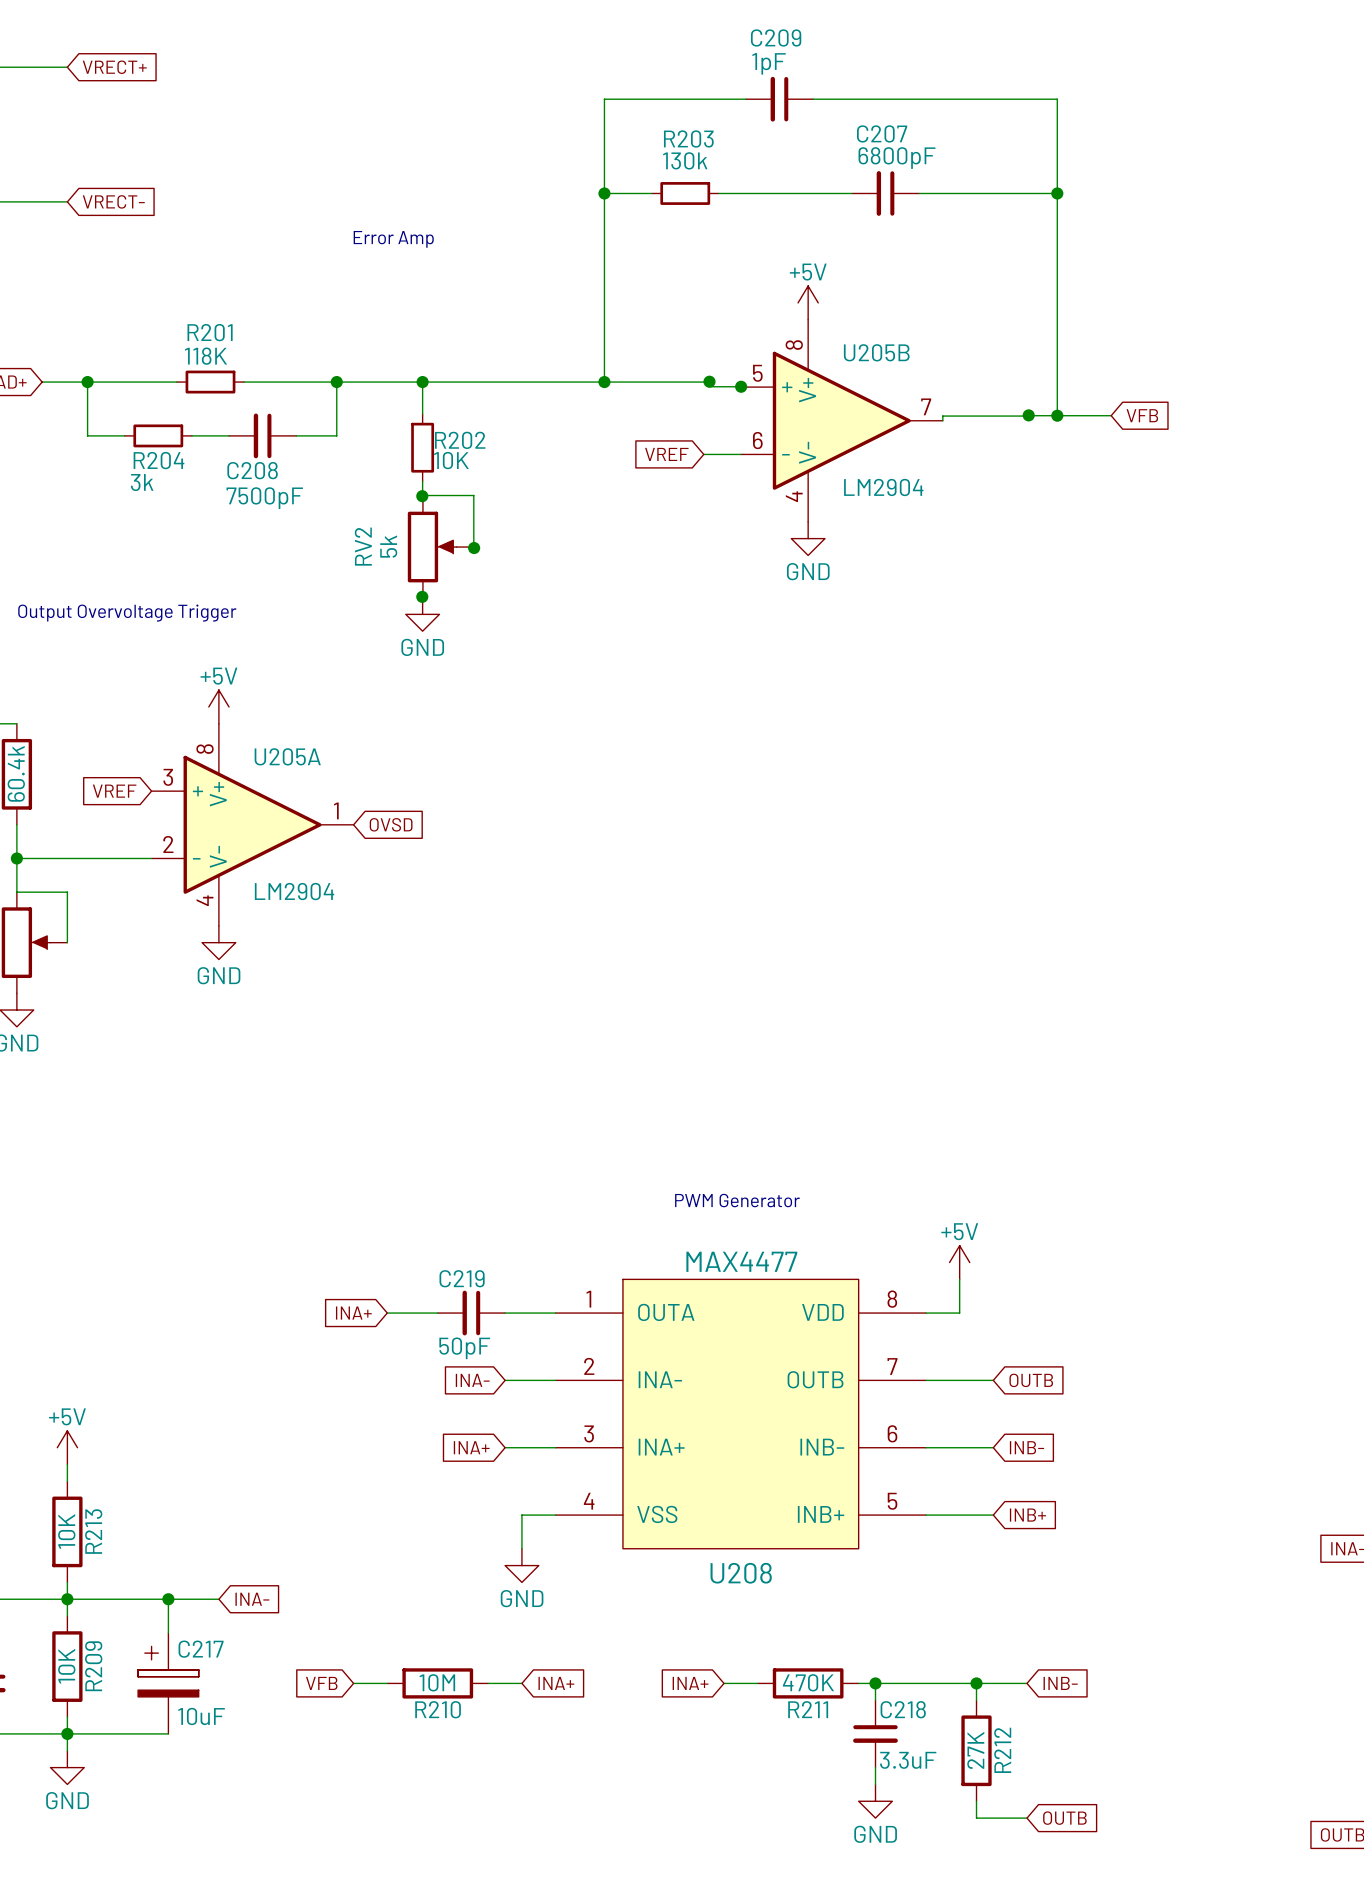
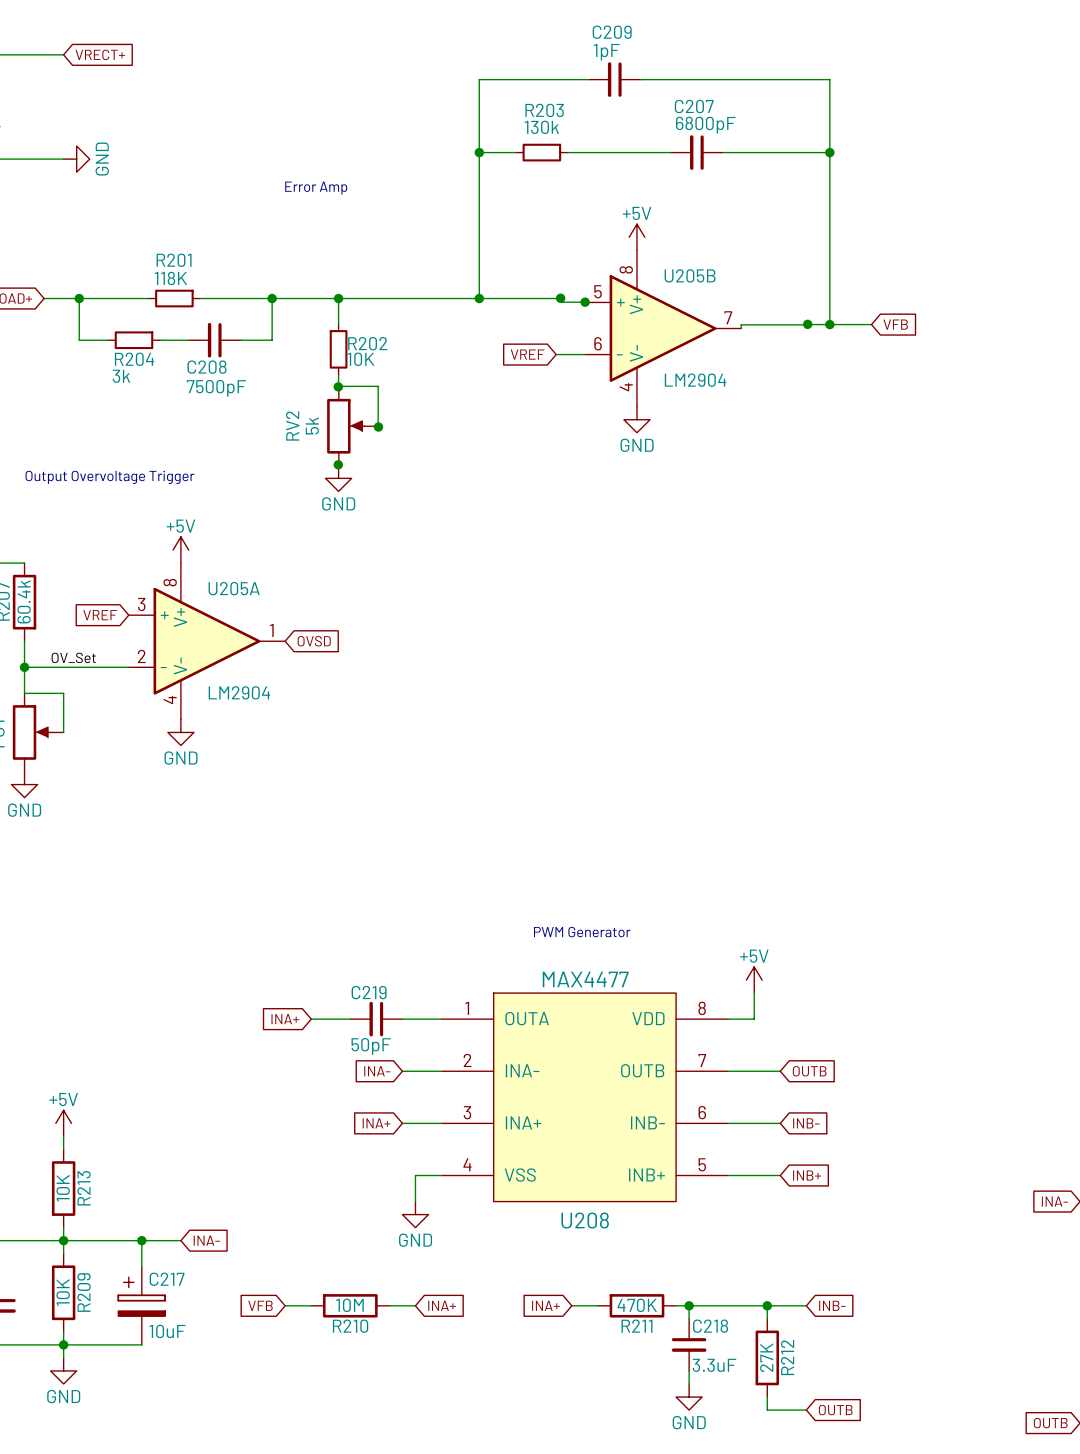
power symbol: none -> GND (76, 159)
global label: VRECT- (113, 201) -> none
label: none -> OV_Set (73, 657)

